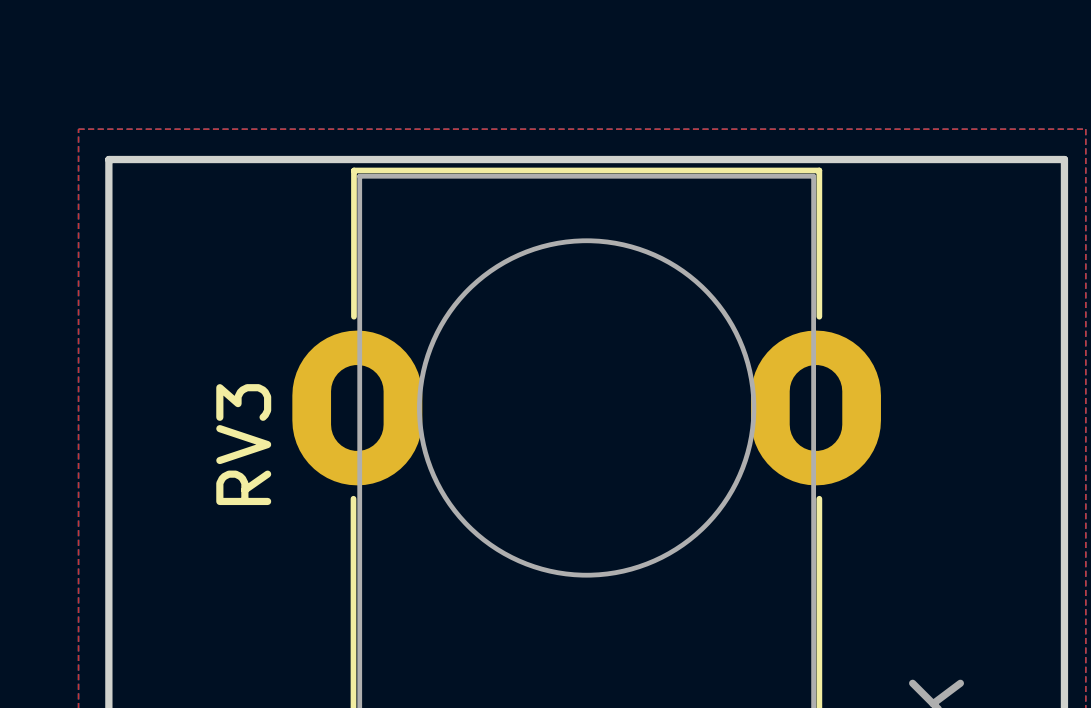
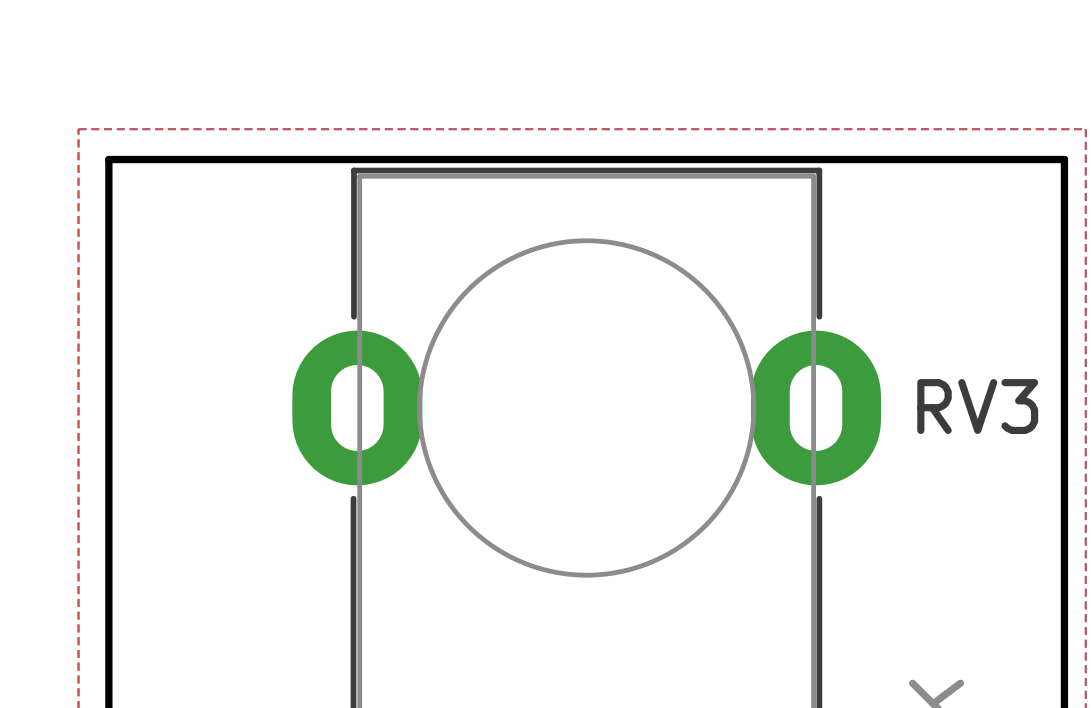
RV3 name rotation: 0° (243, 444) -> 90° clockwise (977, 406)
RV3 name position: RV3 (243, 444) -> RV3 (977, 406)

